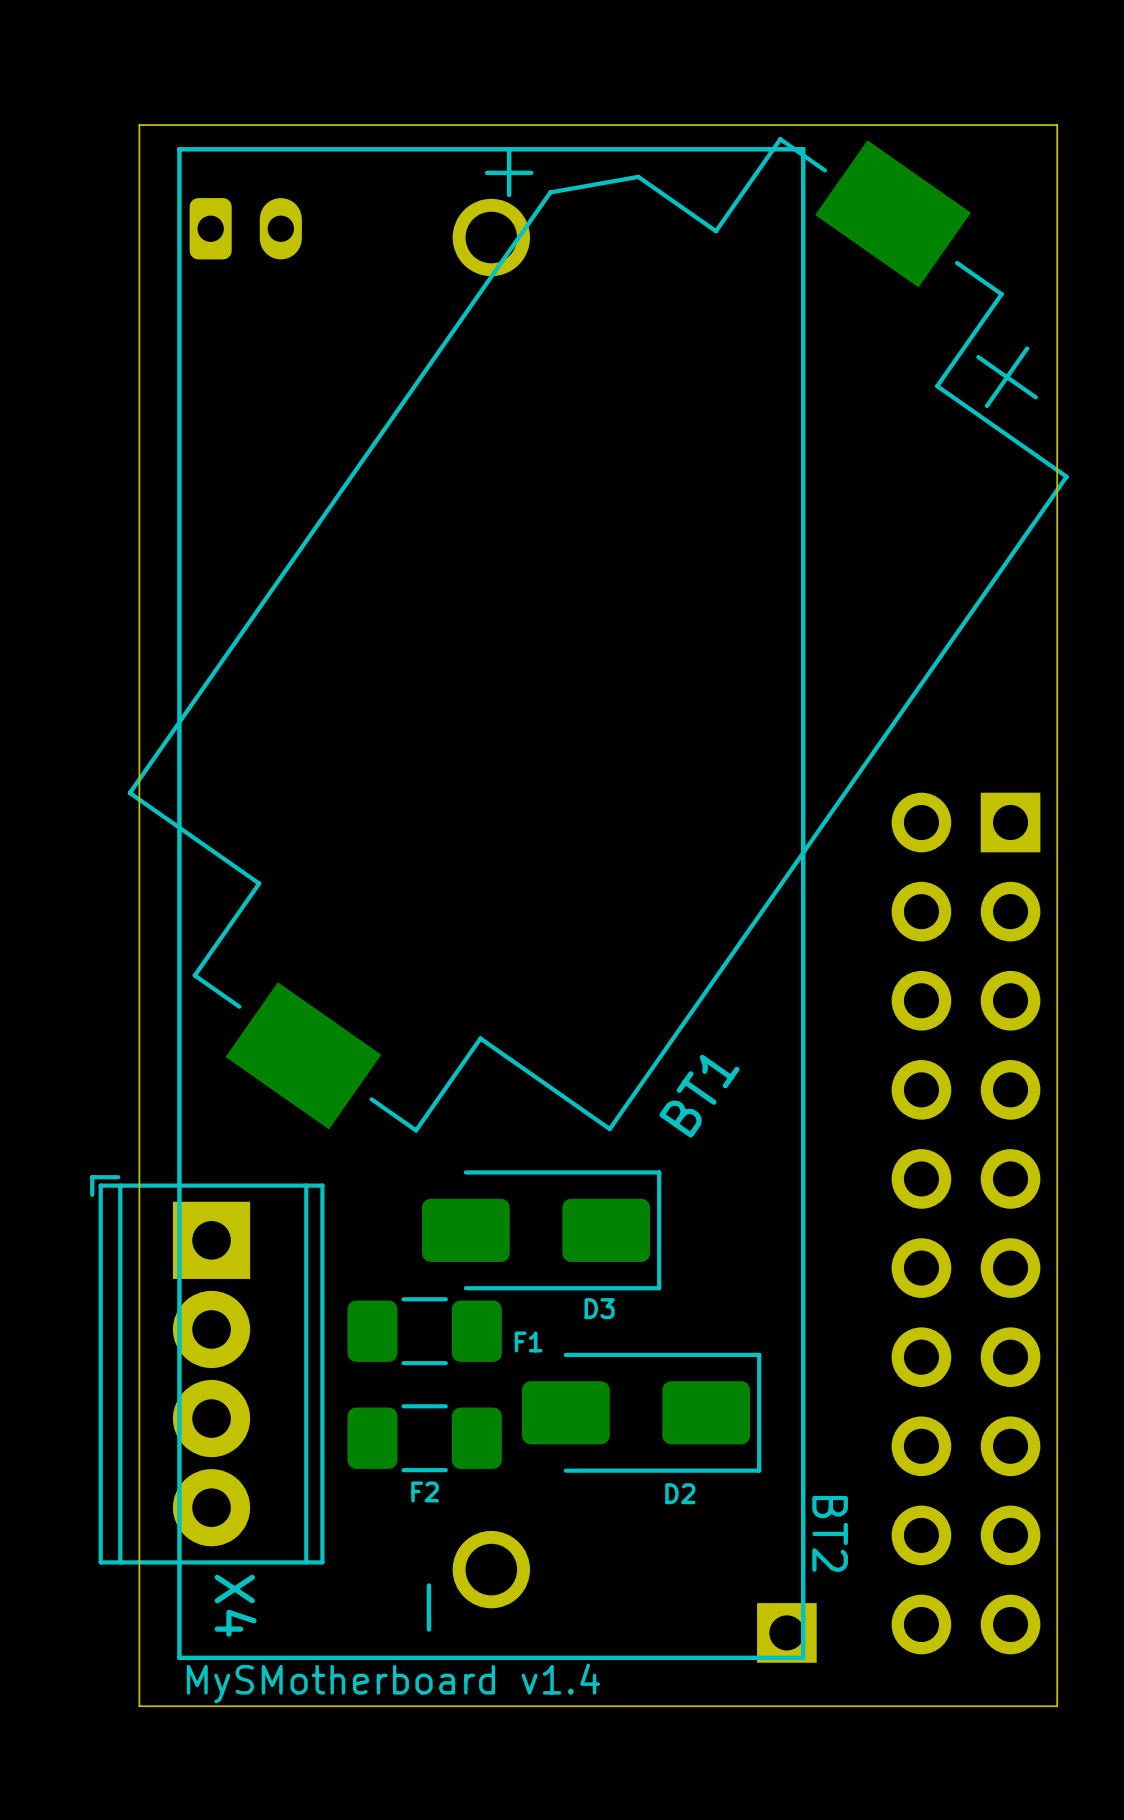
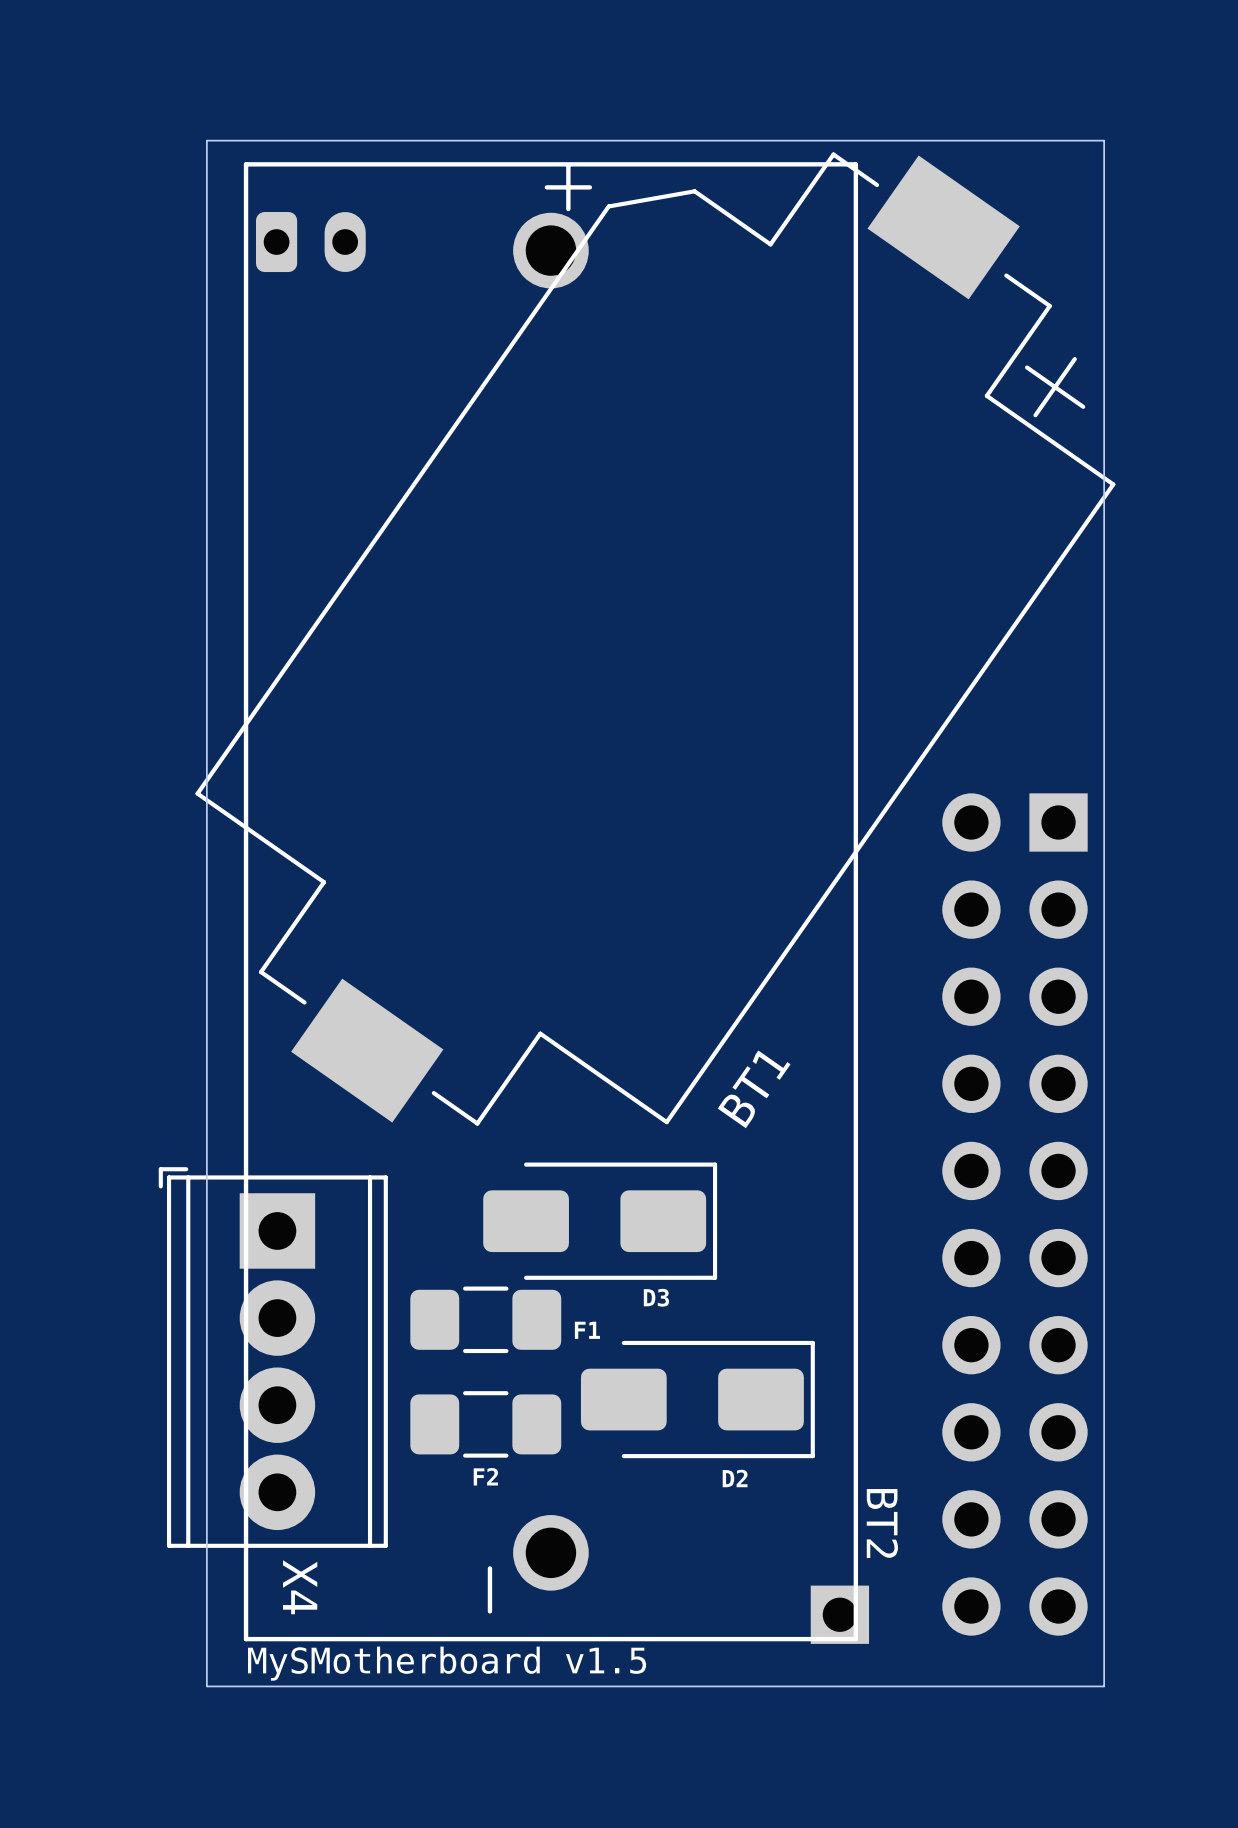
text: MySMotherboard v1.4 (393, 1683) -> MySMotherboard v1.5 (447, 1663)

